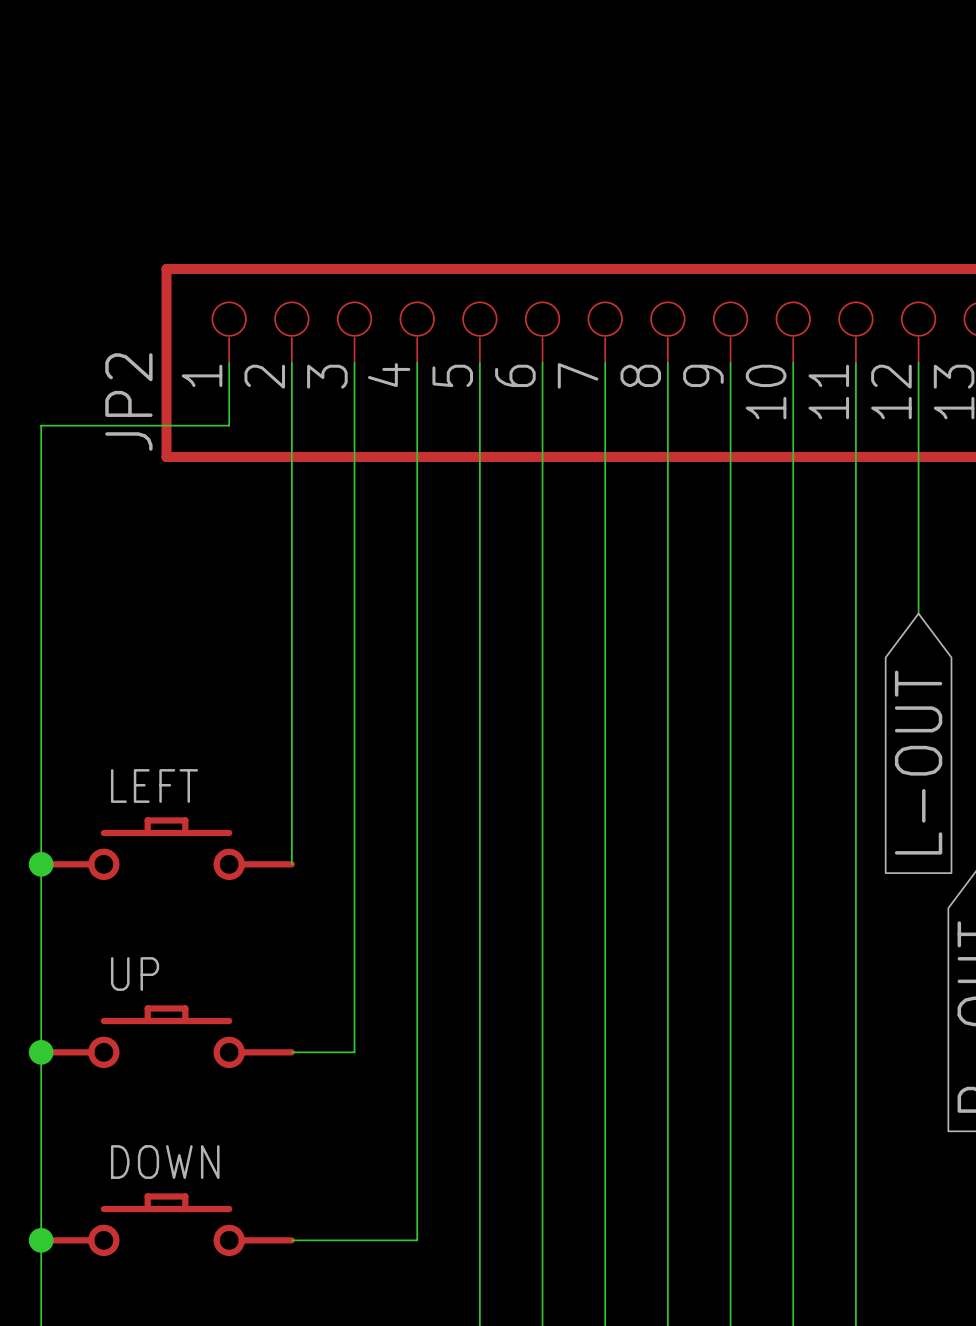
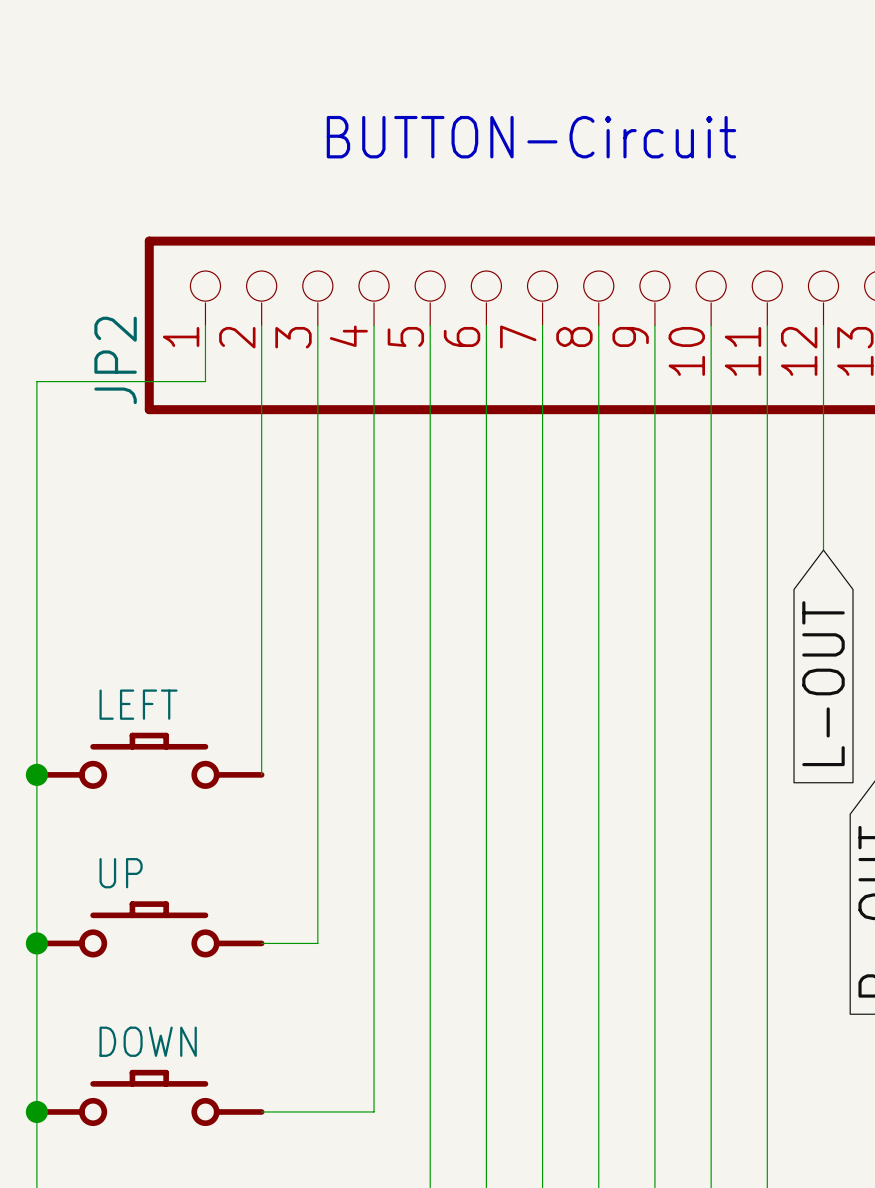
text: none -> BUTTON-Circuit (531, 137)

